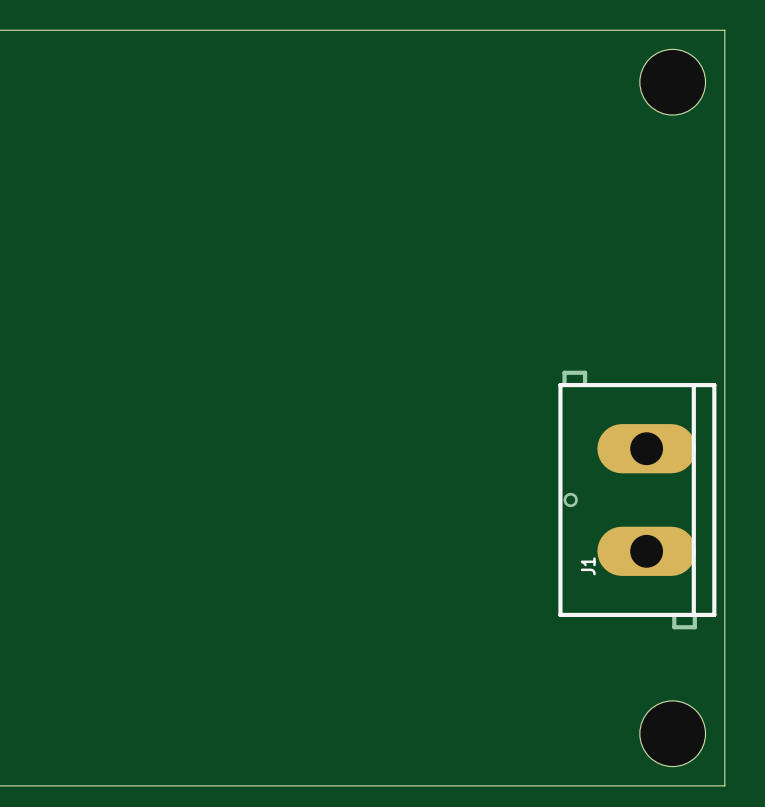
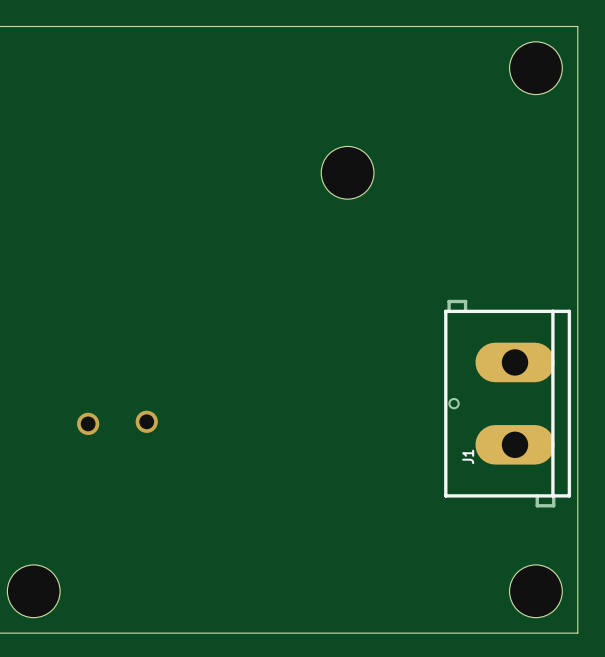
hole: none -> (347, 172)
via: none -> (146, 421)
via: none -> (88, 423)
hole: none -> (33, 591)

